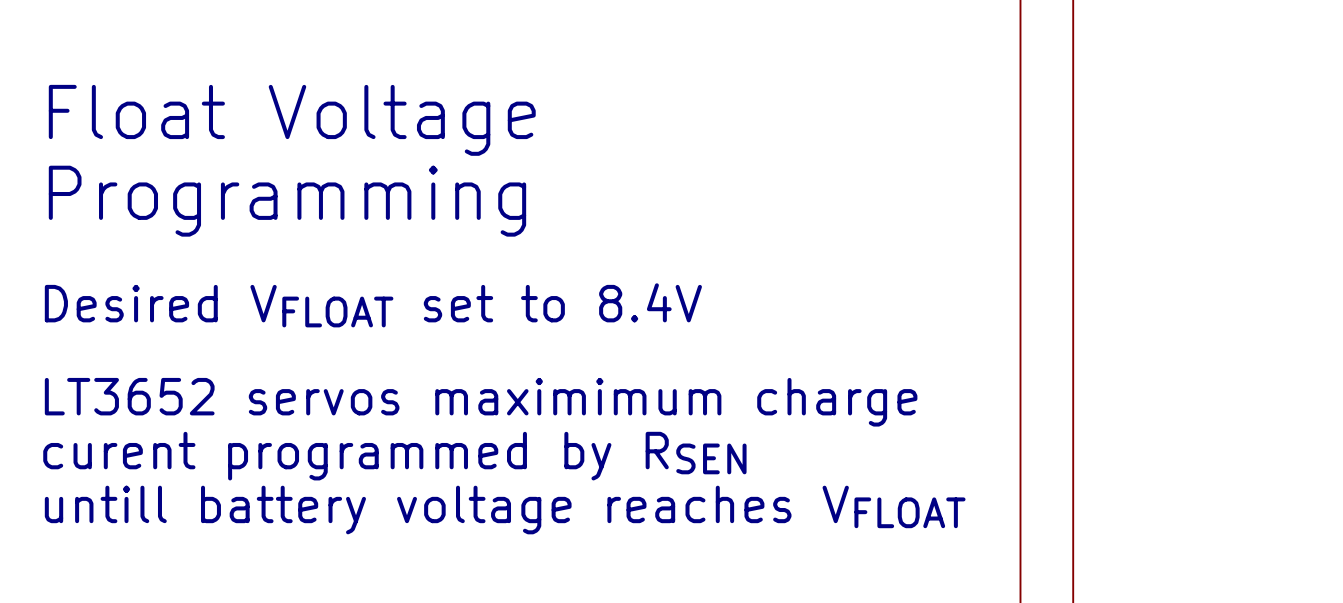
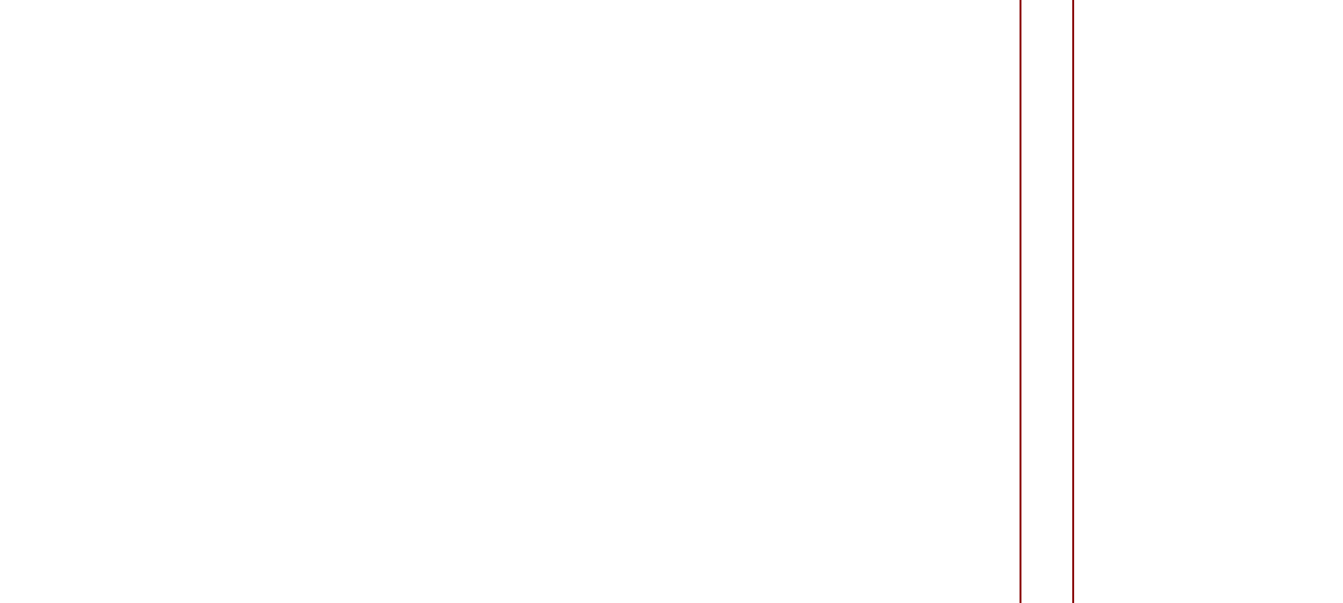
text: Float Voltage (292, 120) -> none
text: Programming (287, 201) -> none
text: Desired VFLOAT set to 8.4V (373, 305) -> none
text: LT3652 servos maximimum charge (481, 402) -> none
text: curent programmed by RSEN (394, 456) -> none
text: untill battery voltage reaches VFLOAT (505, 510) -> none

